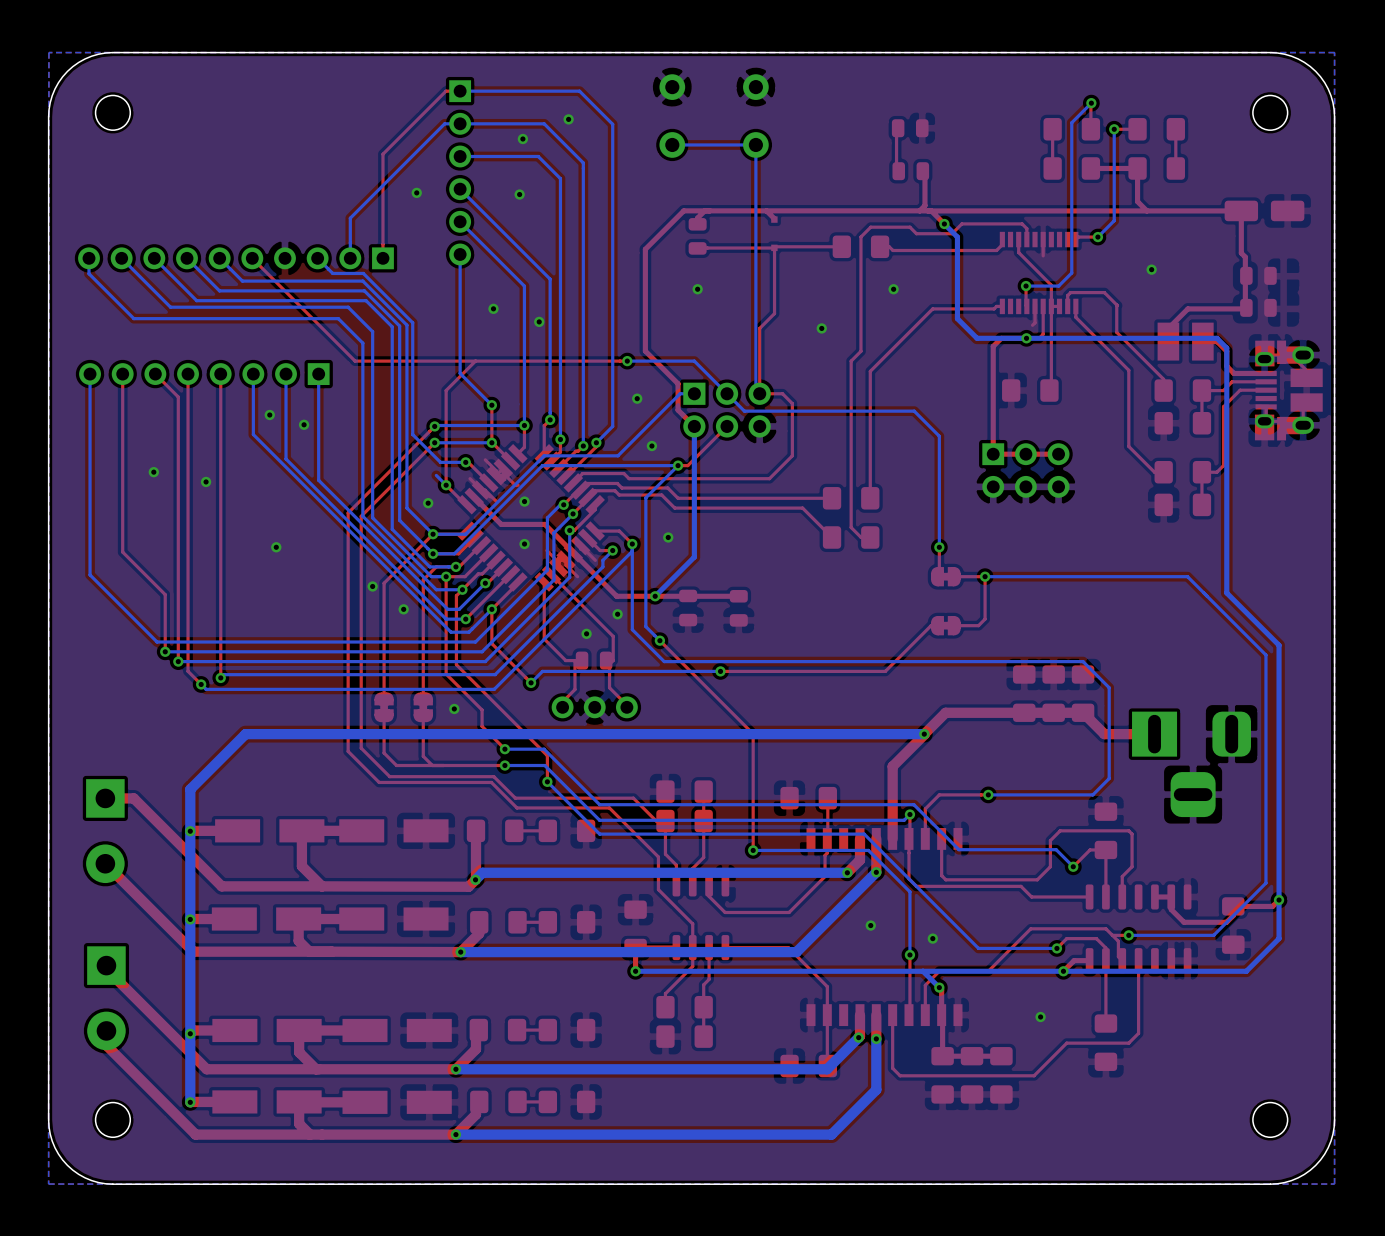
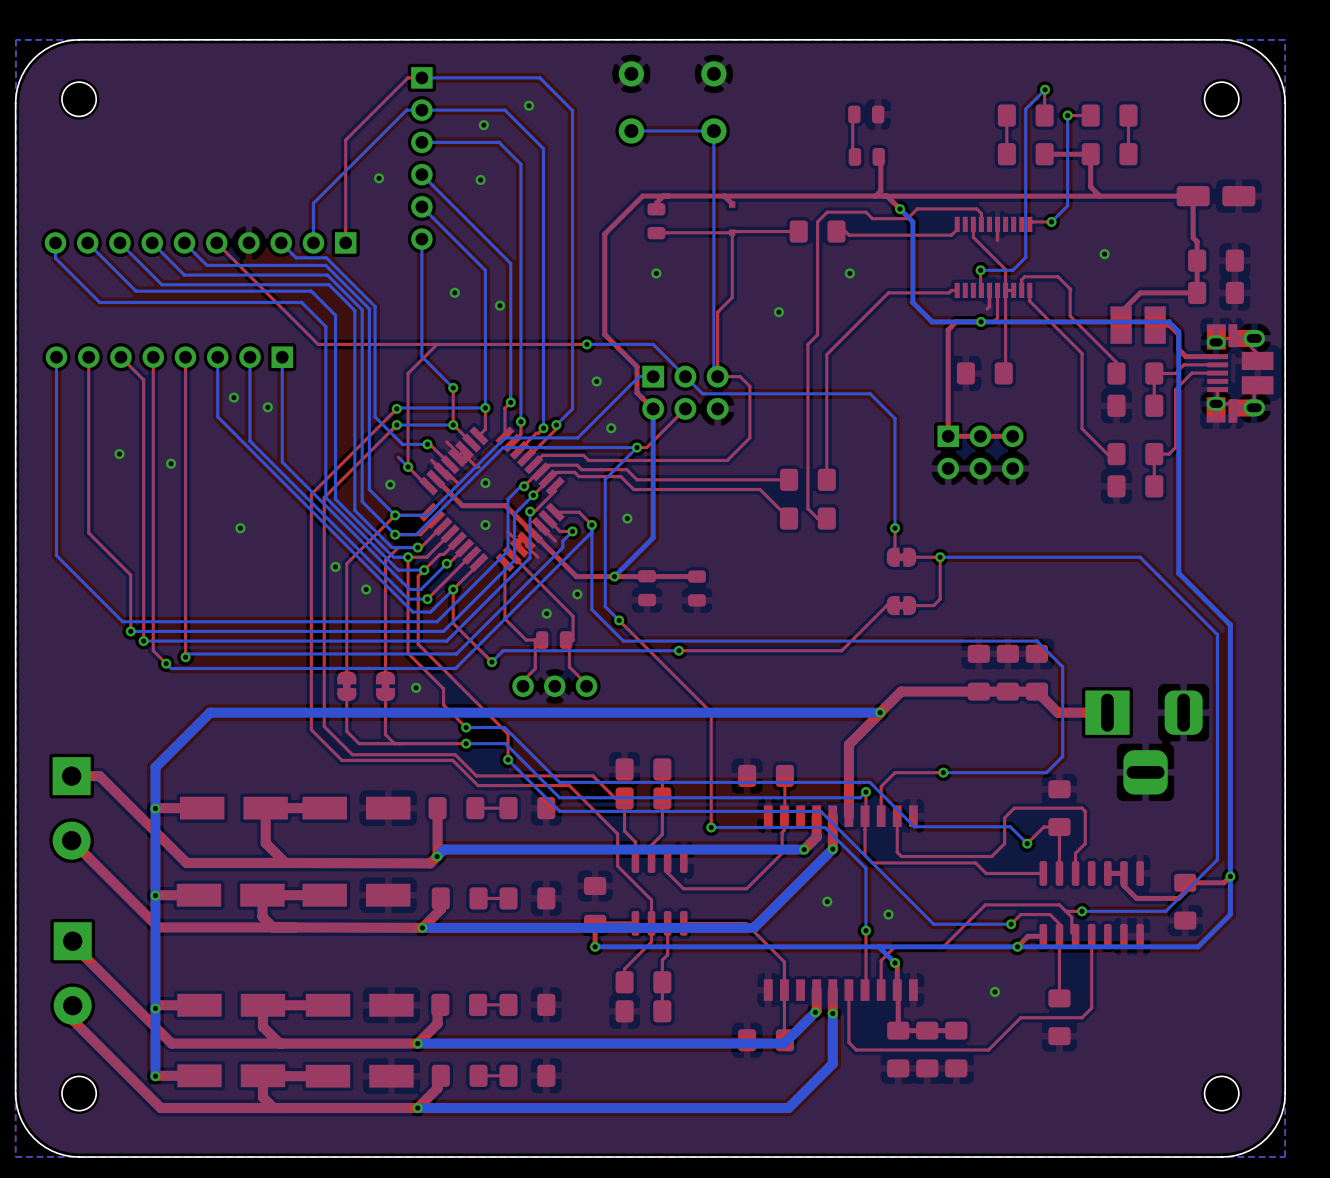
part footprint: [1240, 266, 1277, 285] -> [1188, 249, 1244, 272]
part footprint: [1240, 298, 1277, 317] -> [1188, 281, 1244, 304]

